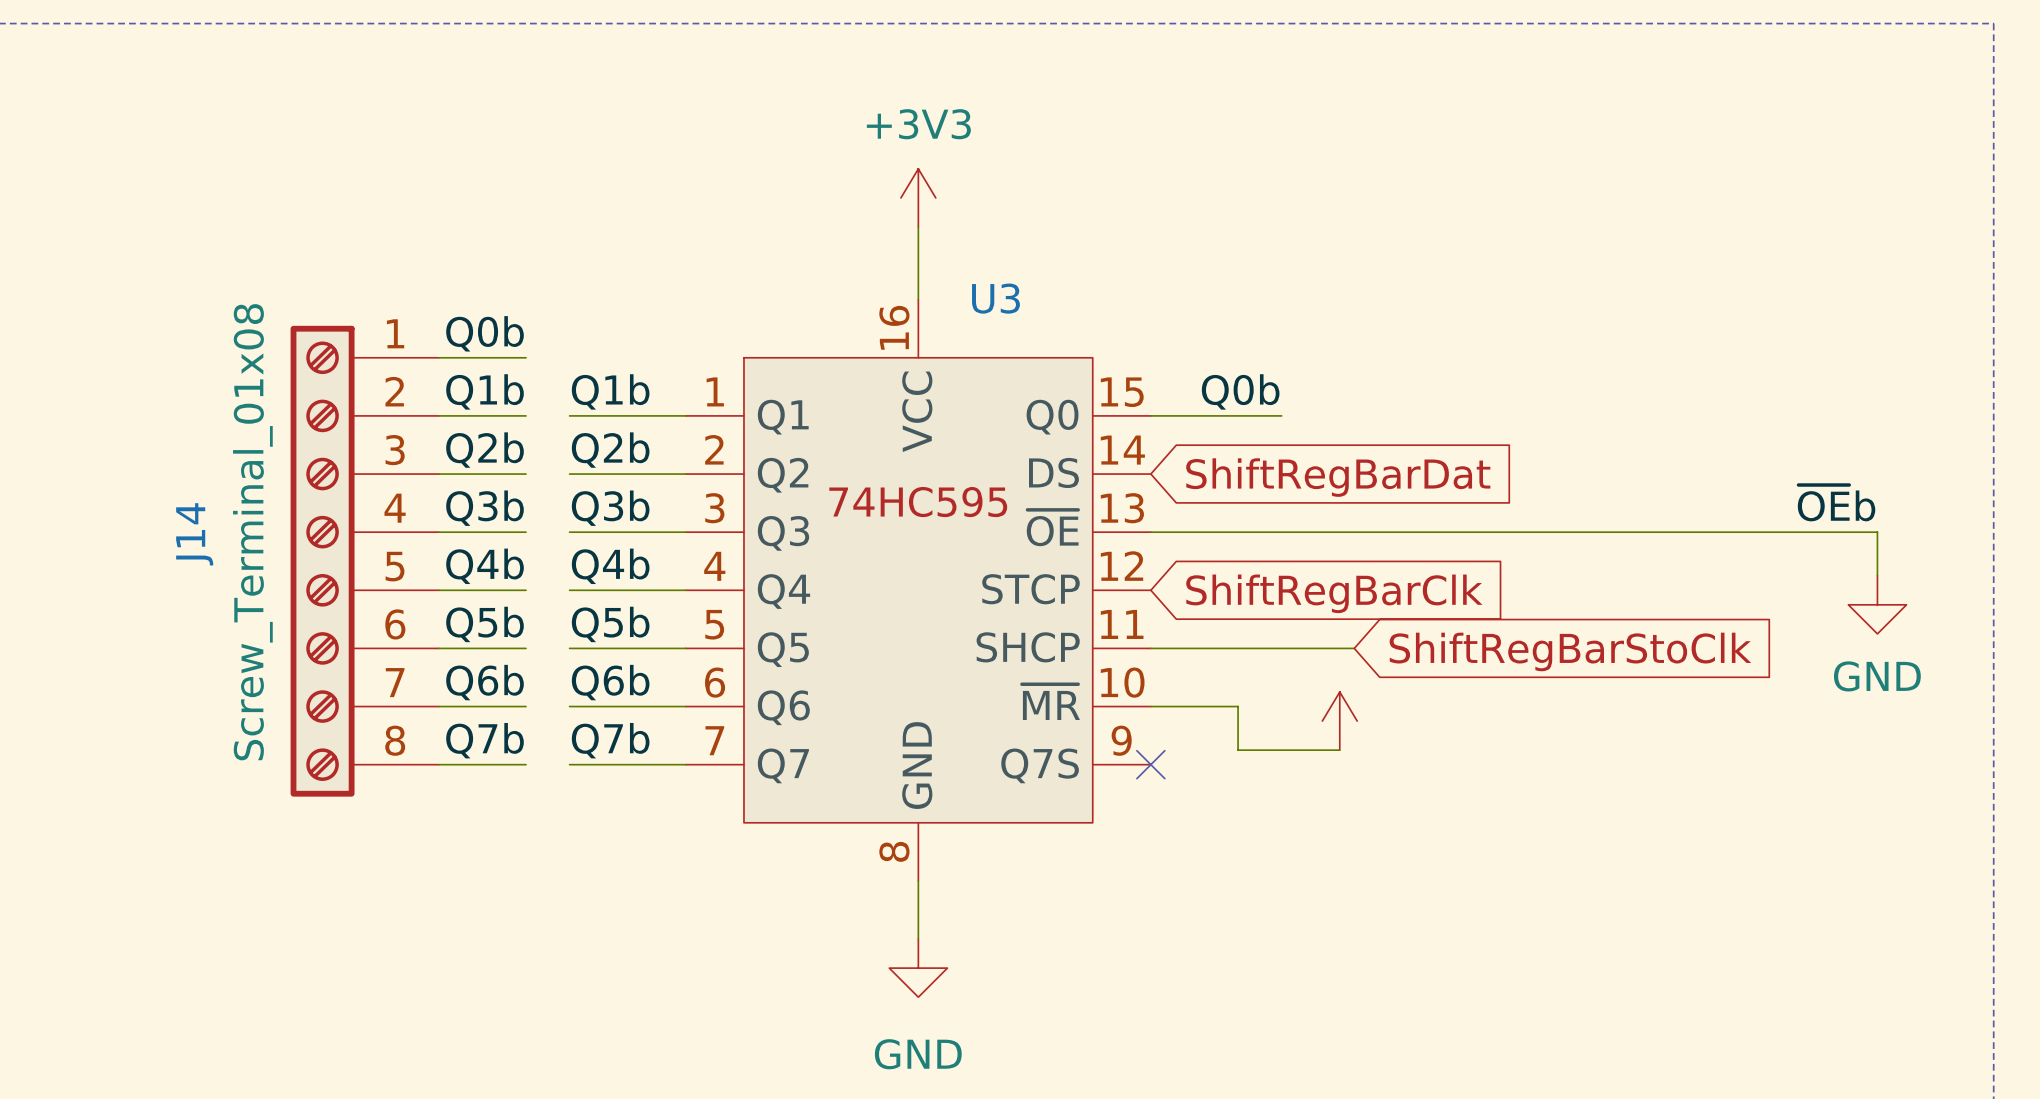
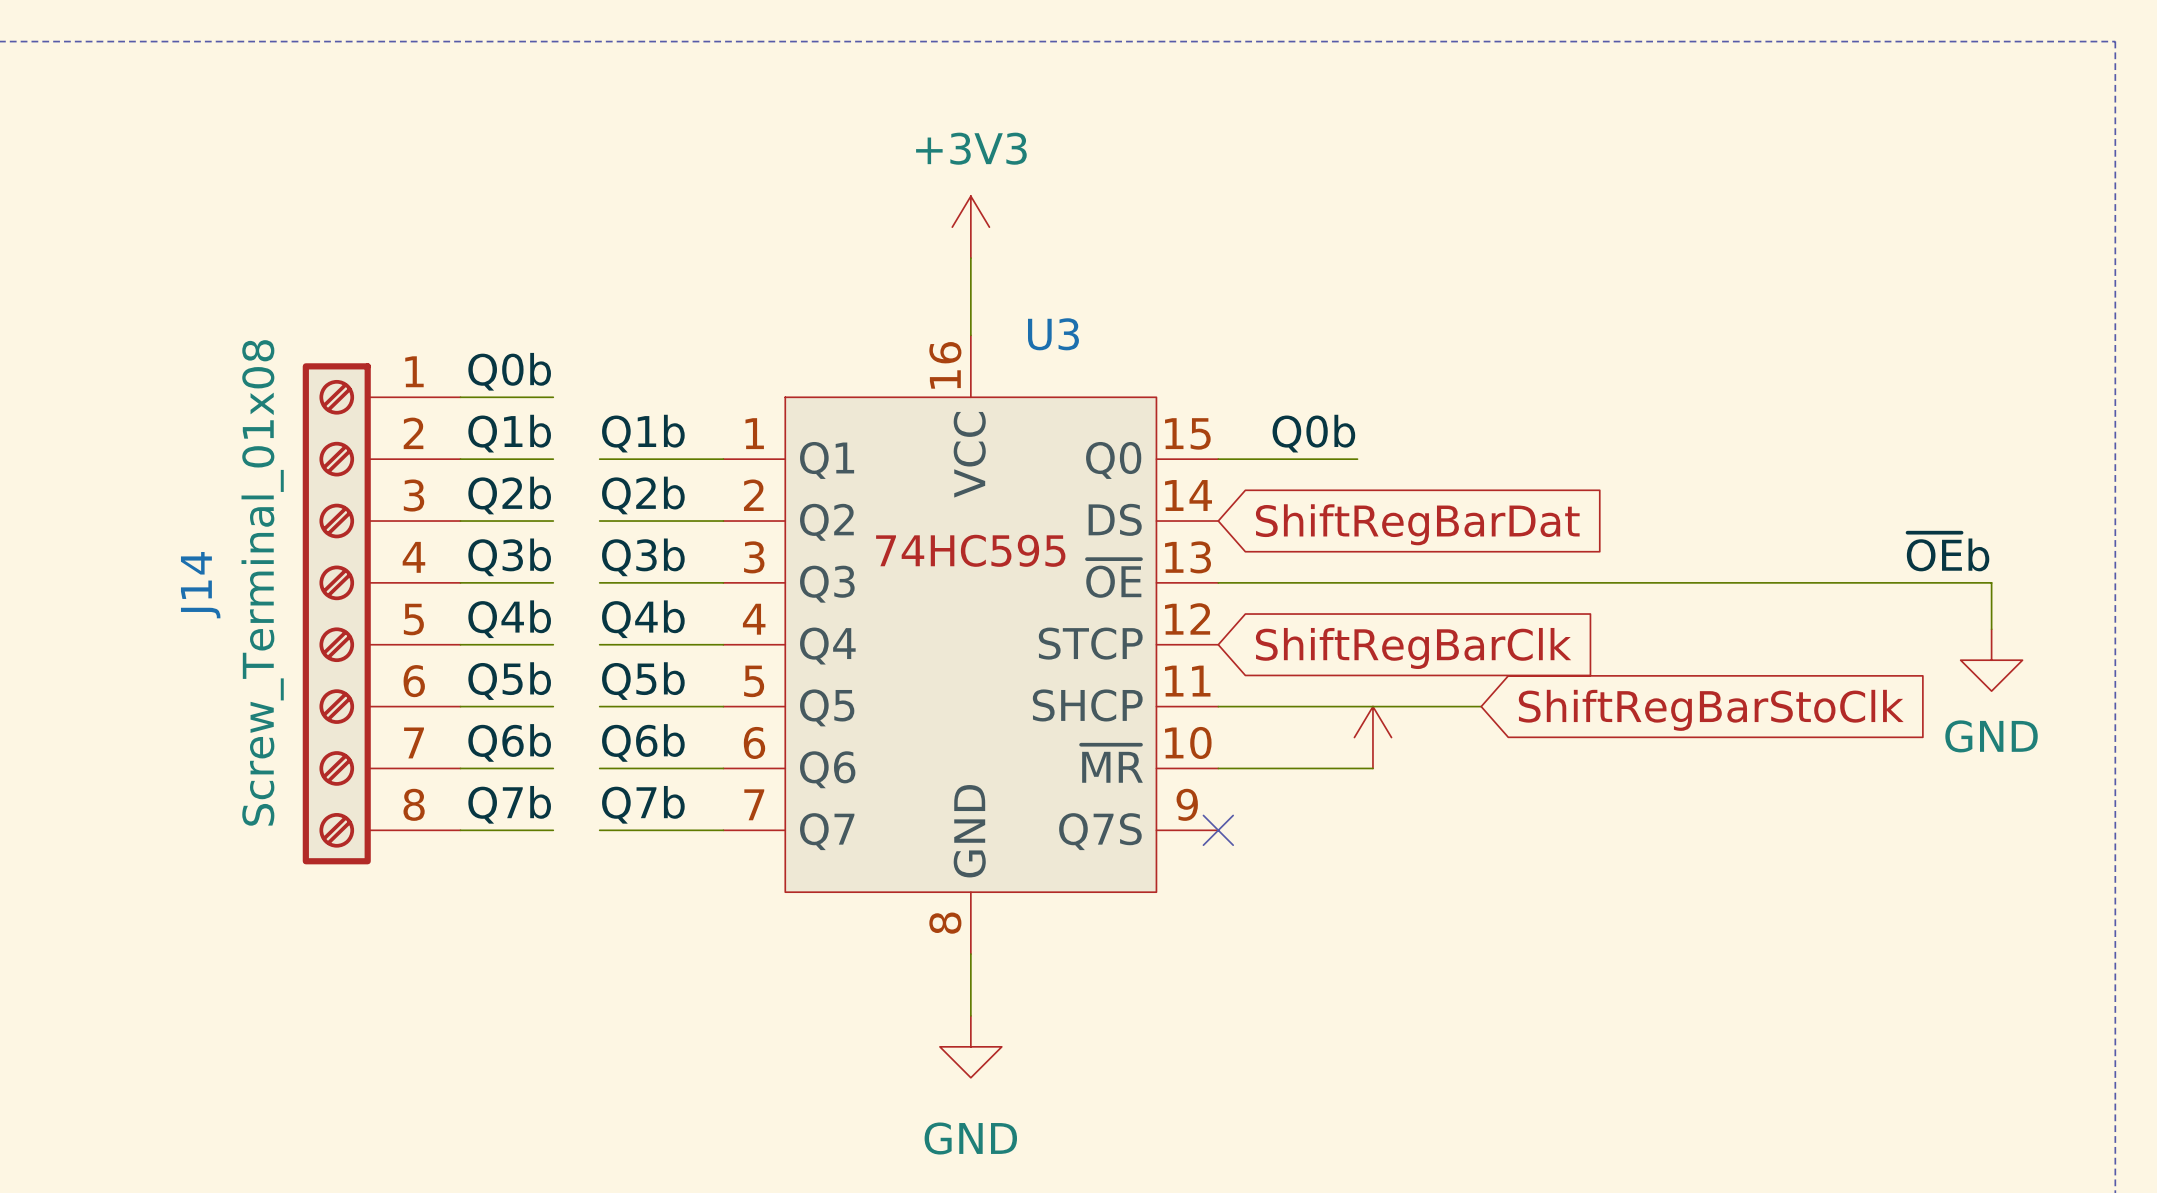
wire: none -> (1434, 706) (1481, 706)
global label position: ShiftRegBarStoClk (1570, 651) -> ShiftRegBarStoClk (1711, 710)
wire: (1238, 706) (1238, 750) (1339, 750) -> (1311, 768) (1372, 768)
power symbol position: (1339, 721) -> (1372, 737)

